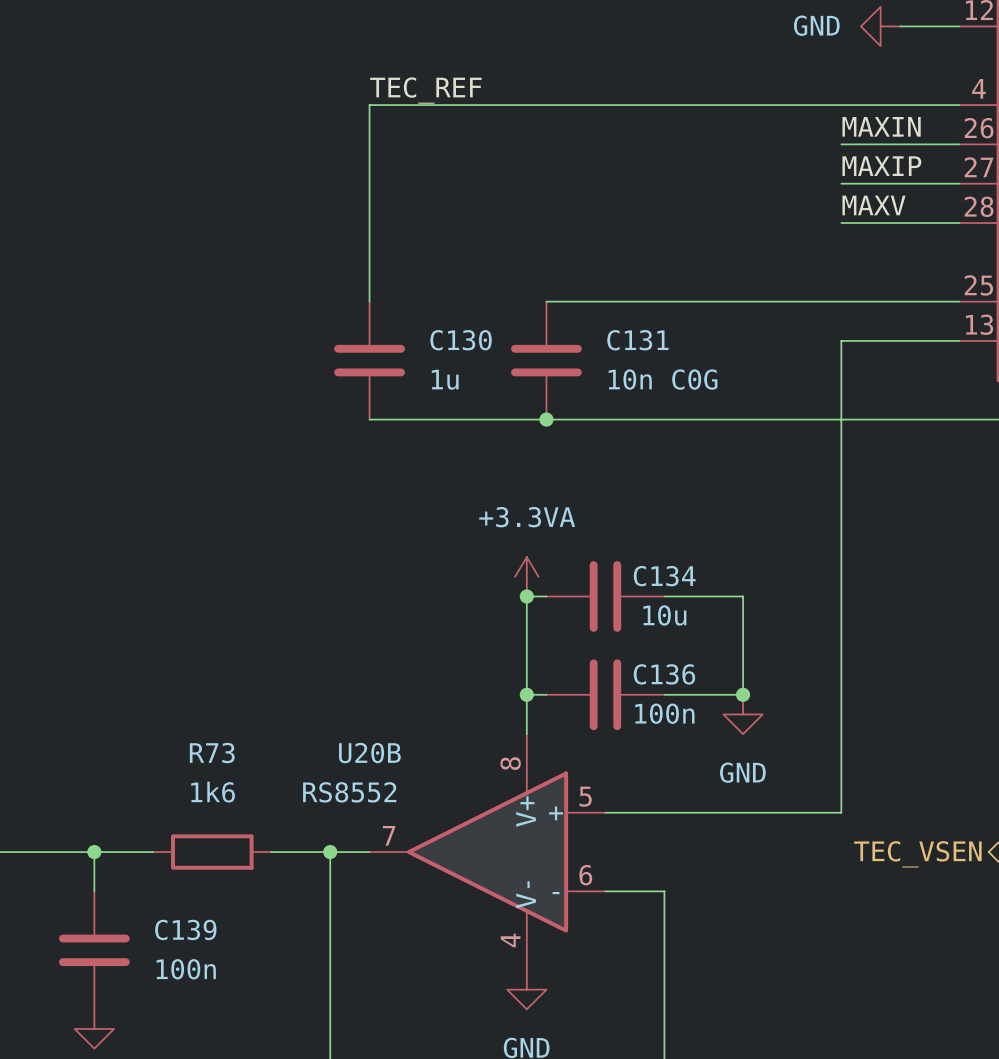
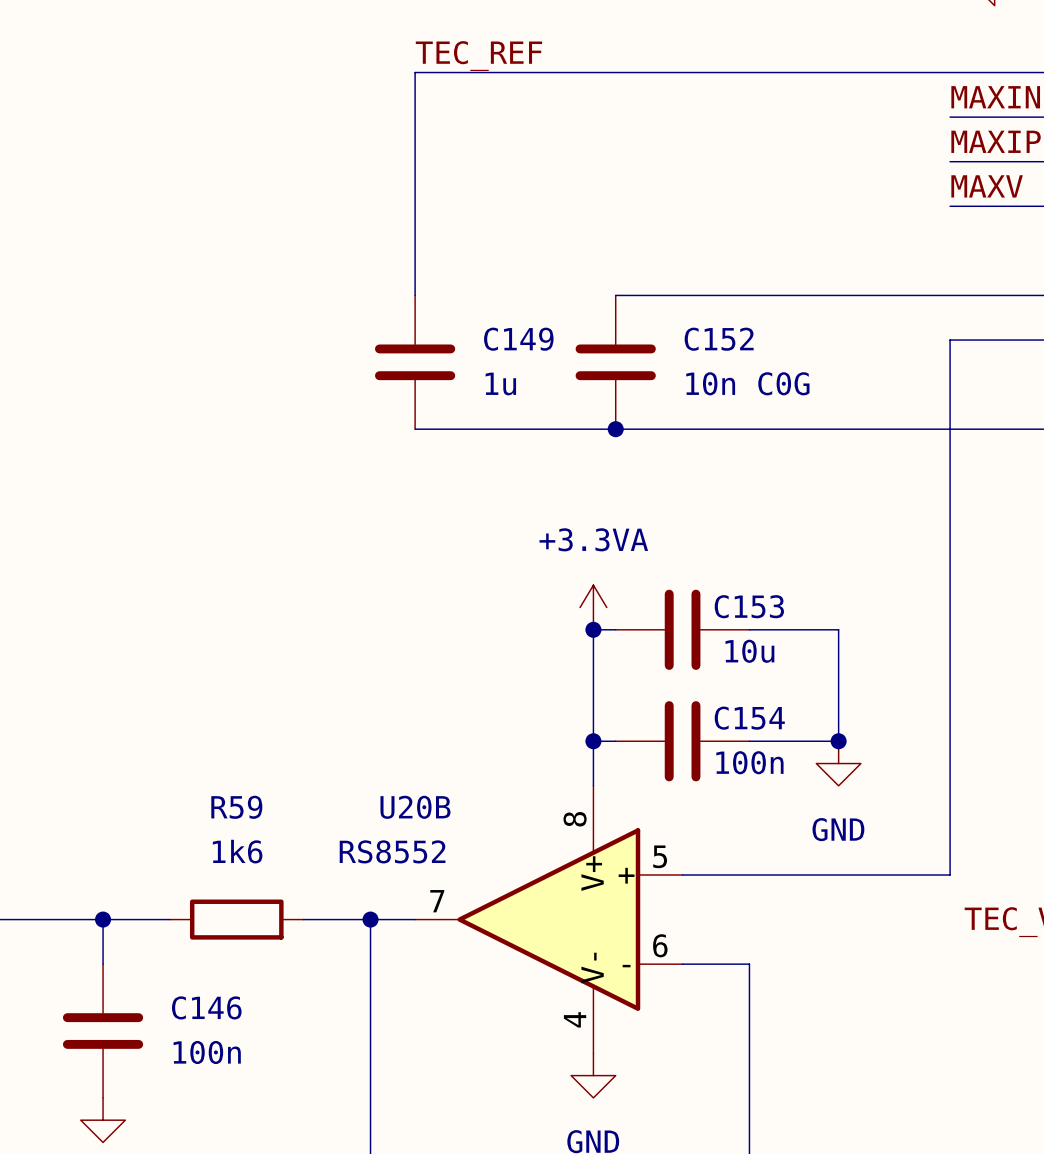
C130 name: C130 (461, 340) -> C149 (518, 339)
C131 name: C131 (637, 340) -> C152 (719, 339)
C134 name: C134 (664, 576) -> C153 (749, 606)
C136 name: C136 (664, 674) -> C154 (749, 718)
R73 name: R73 (212, 753) -> R59 (236, 807)
C139 name: C139 (185, 929) -> C146 (206, 1007)

